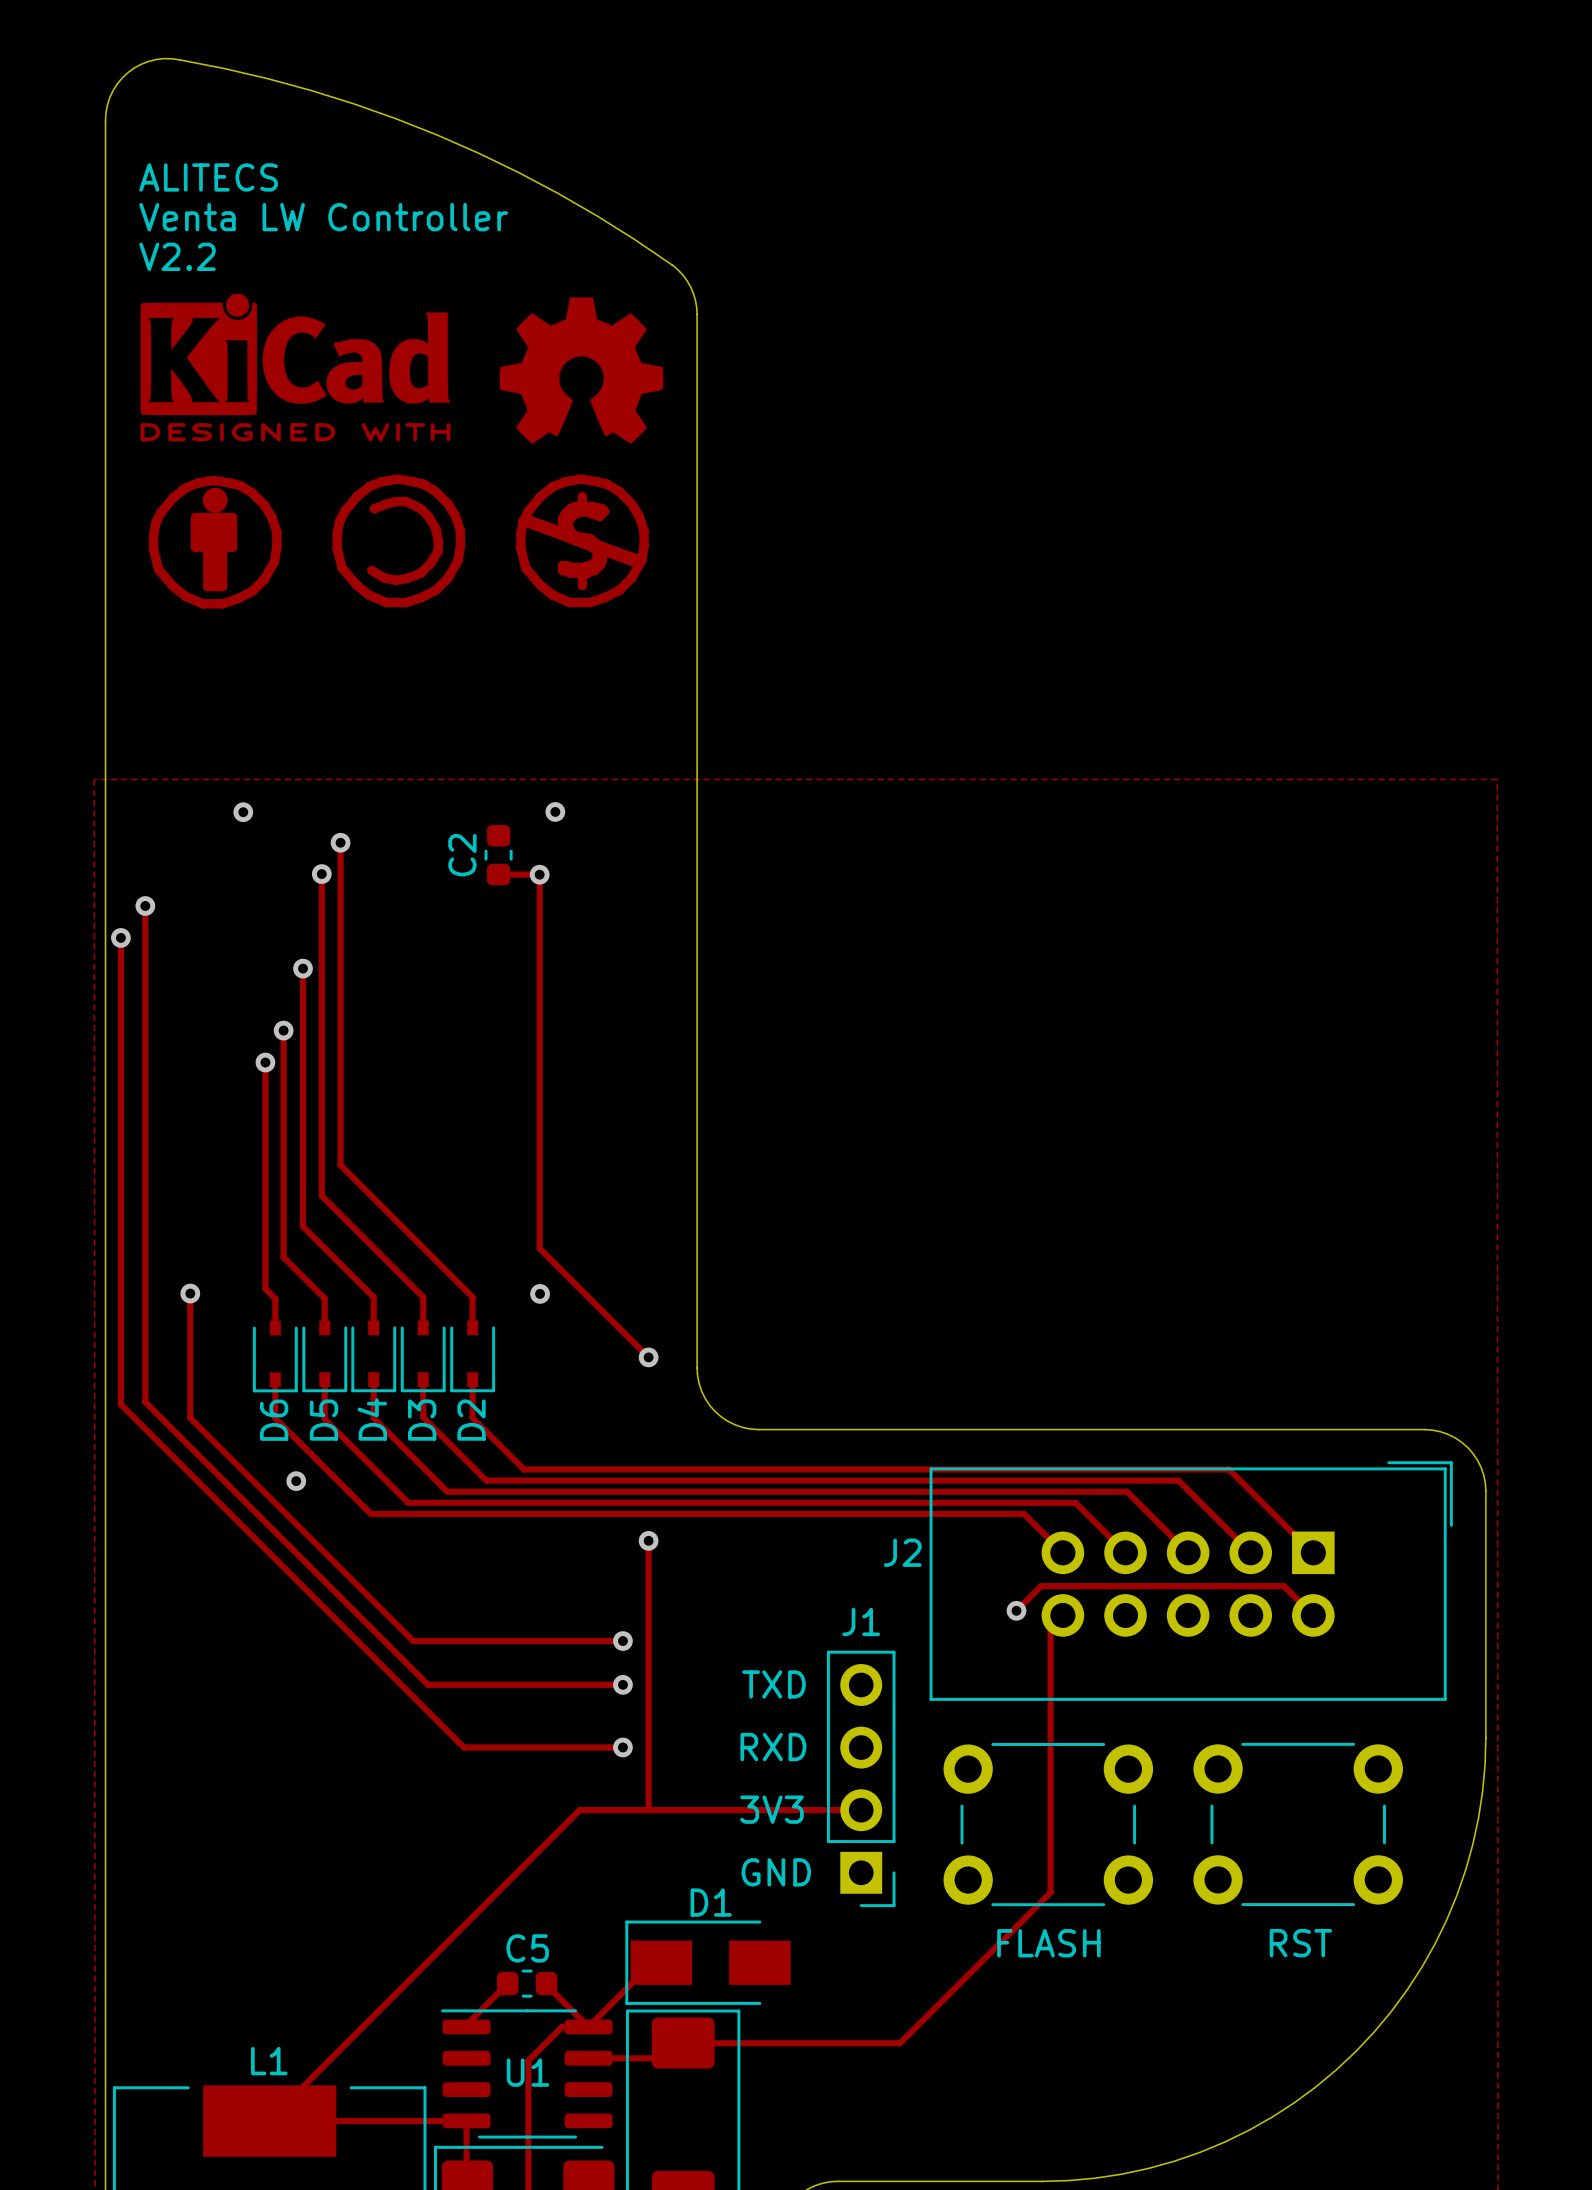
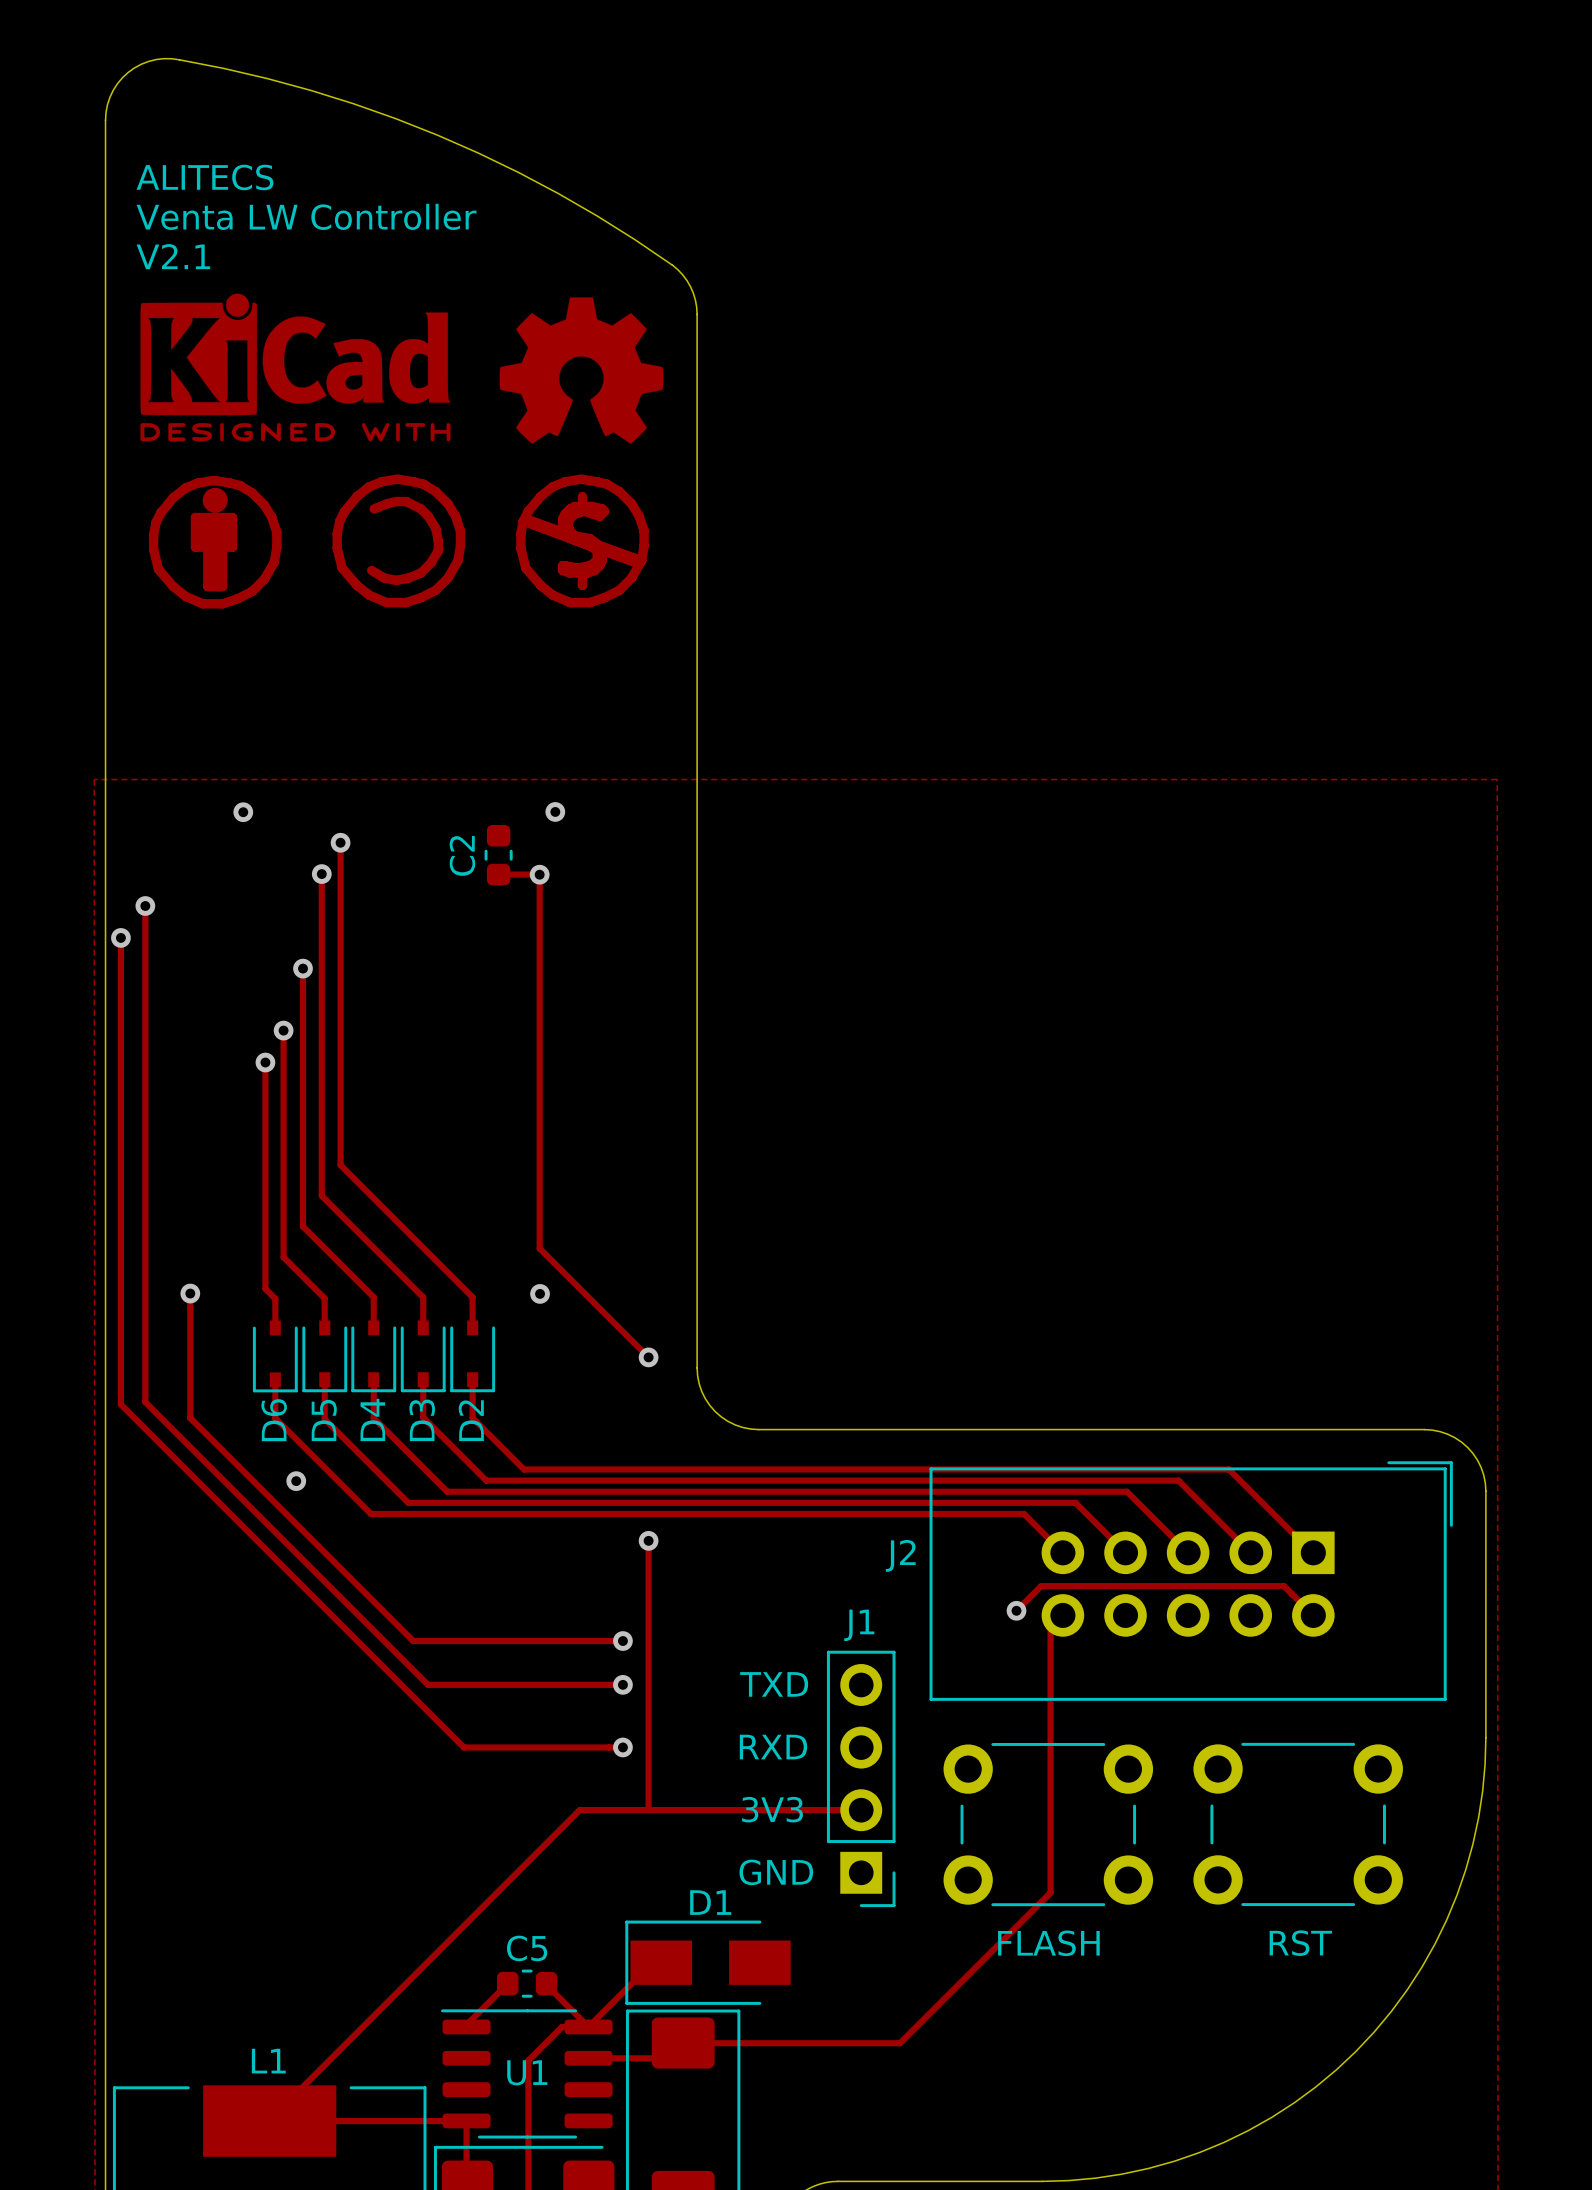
text: V2.2 (177, 256) -> V2.1 (173, 256)

